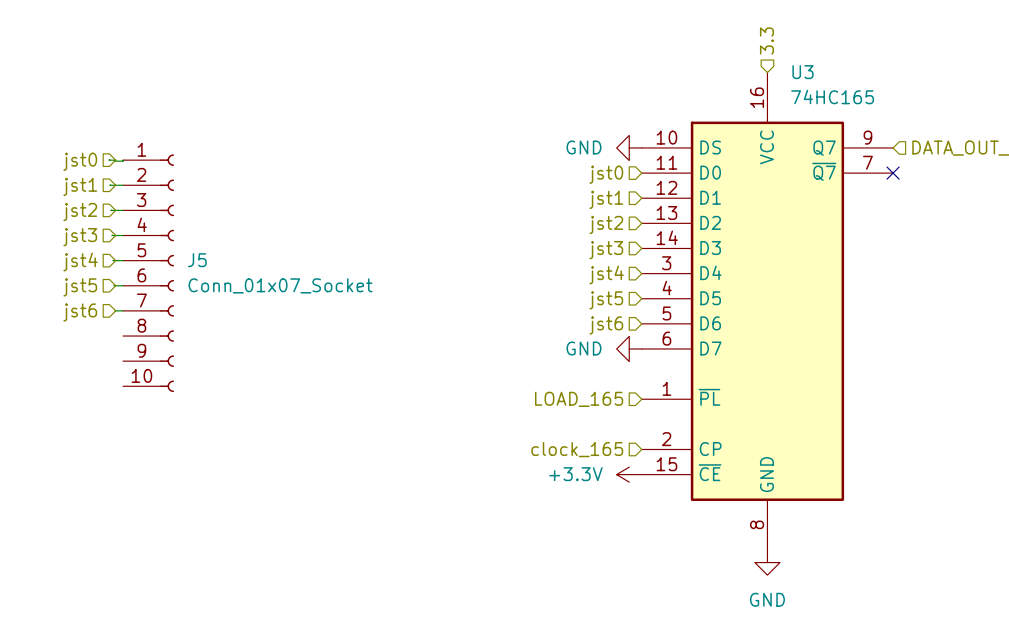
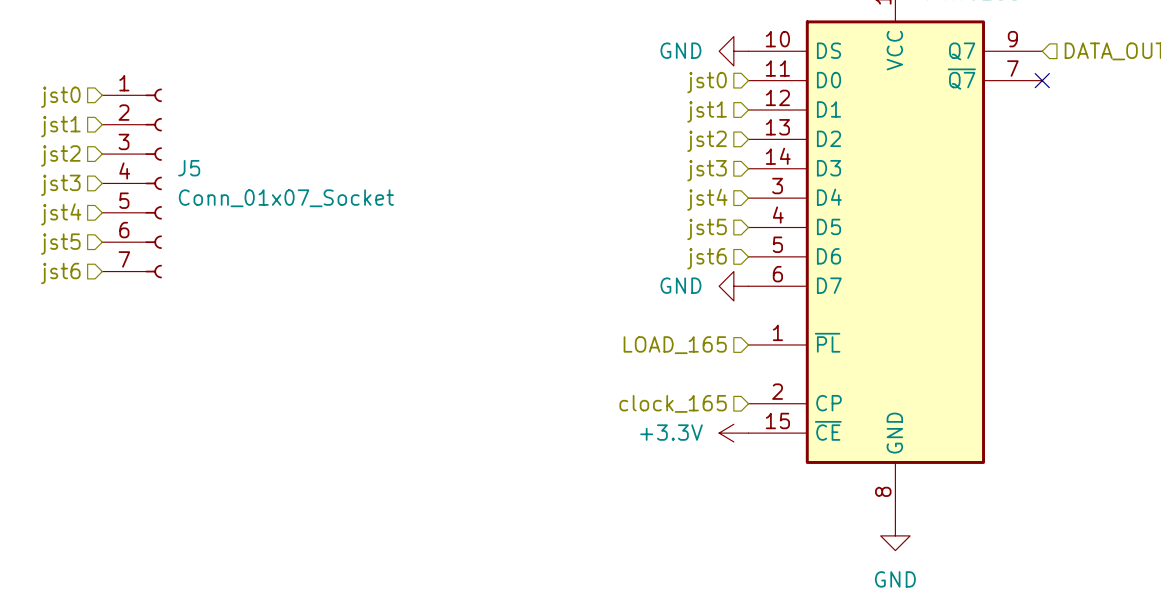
J5 symbol: [123, 154, 175, 393] -> [102, 88, 162, 279]
wire: (109, 159) (115, 160) -> none
wire: (123, 160) (114, 161) -> none
hierarchical label position: jst0 (80, 161) -> jst0 (60, 97)
hierarchical label position: jst1 (80, 186) -> jst1 (60, 126)
hierarchical label position: jst2 (80, 212) -> jst2 (60, 155)
hierarchical label position: jst3 (80, 237) -> jst3 (60, 185)
hierarchical label position: jst4 (80, 261) -> jst4 (61, 214)
hierarchical label position: jst5 (80, 287) -> jst5 (60, 244)
hierarchical label position: jst6 (80, 312) -> jst6 (60, 273)

